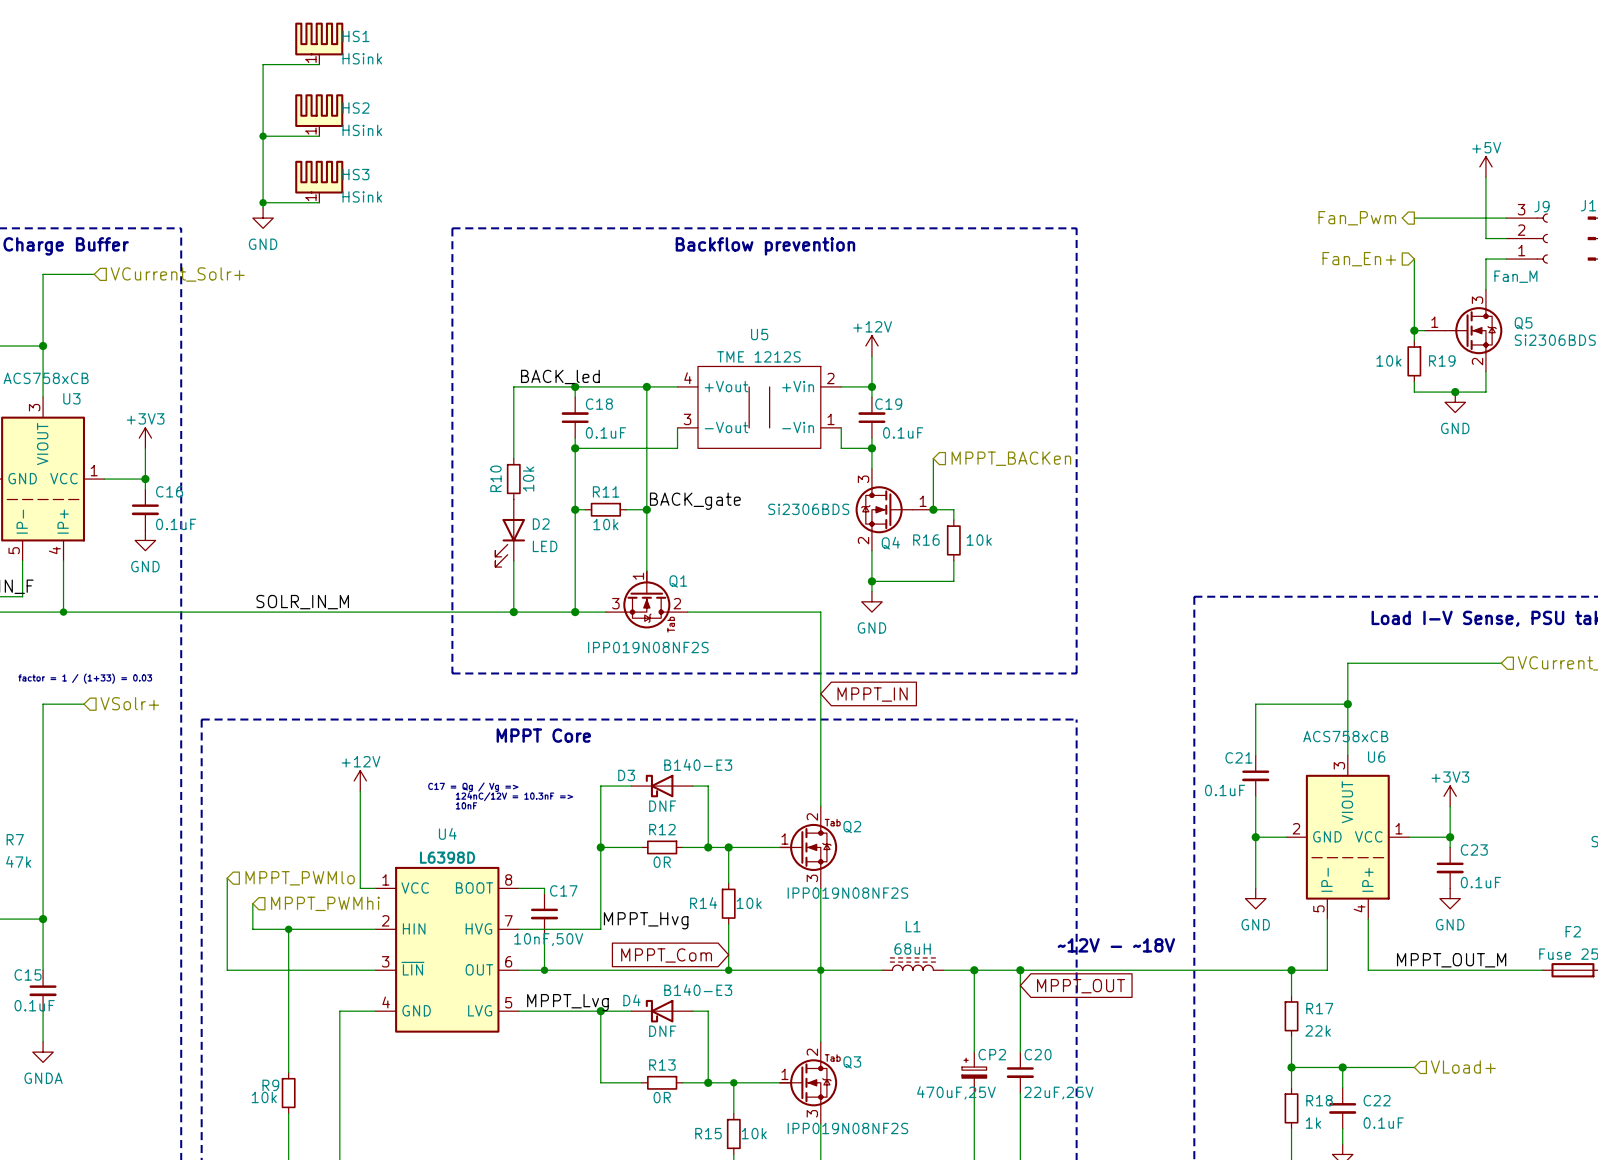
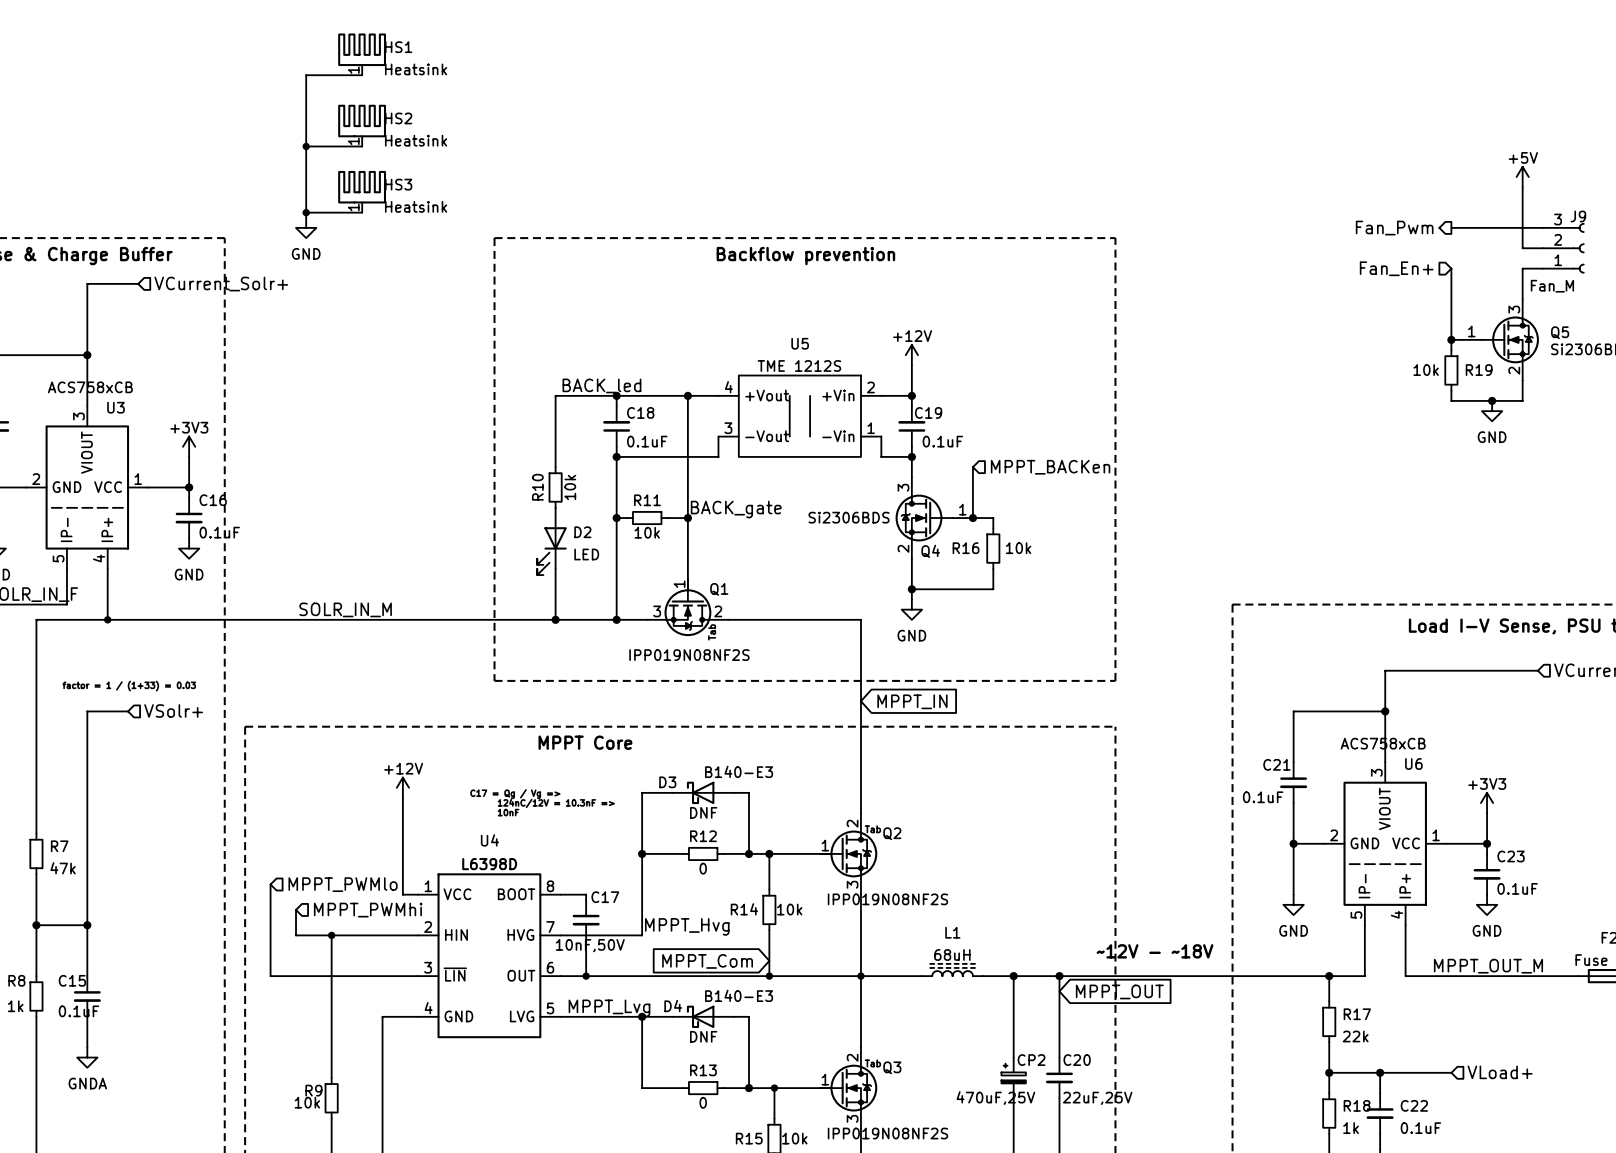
HS1 value: HSink (362, 58) -> Heatsink (416, 69)
HS2 value: HSink (362, 130) -> Heatsink (416, 140)
HS3 value: HSink (362, 196) -> Heatsink (416, 206)
R12 value: 0R (662, 862) -> 0 (703, 868)
R13 value: 0R (662, 1097) -> 0 (703, 1102)

